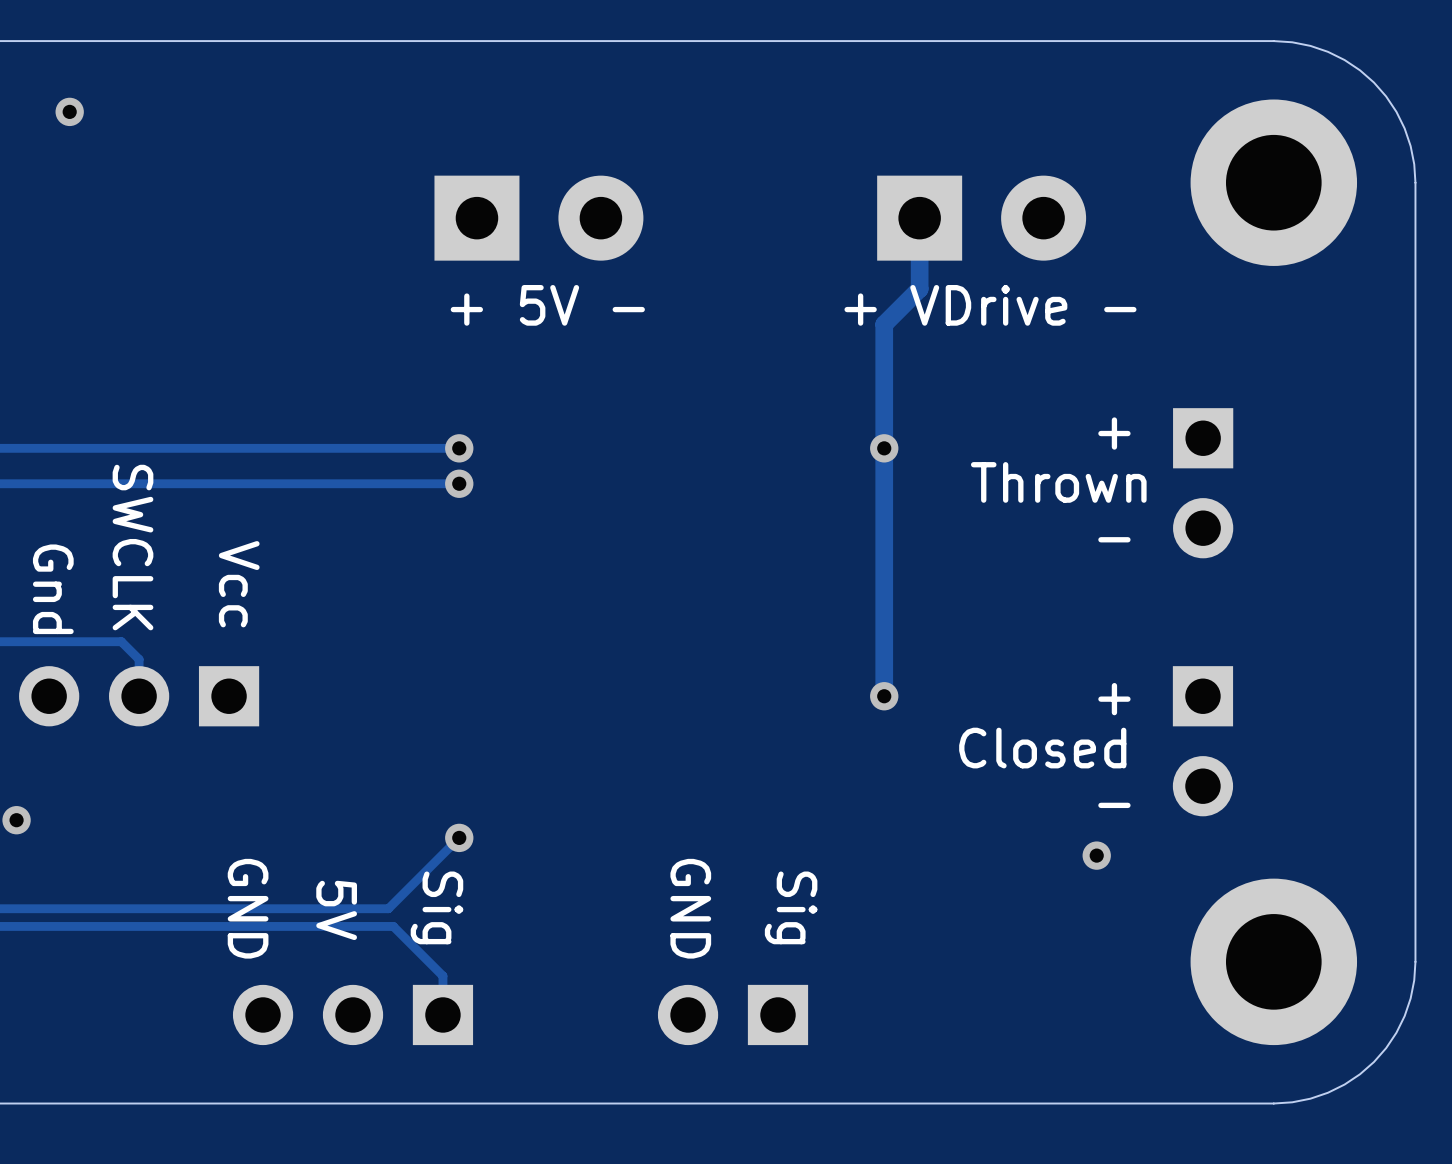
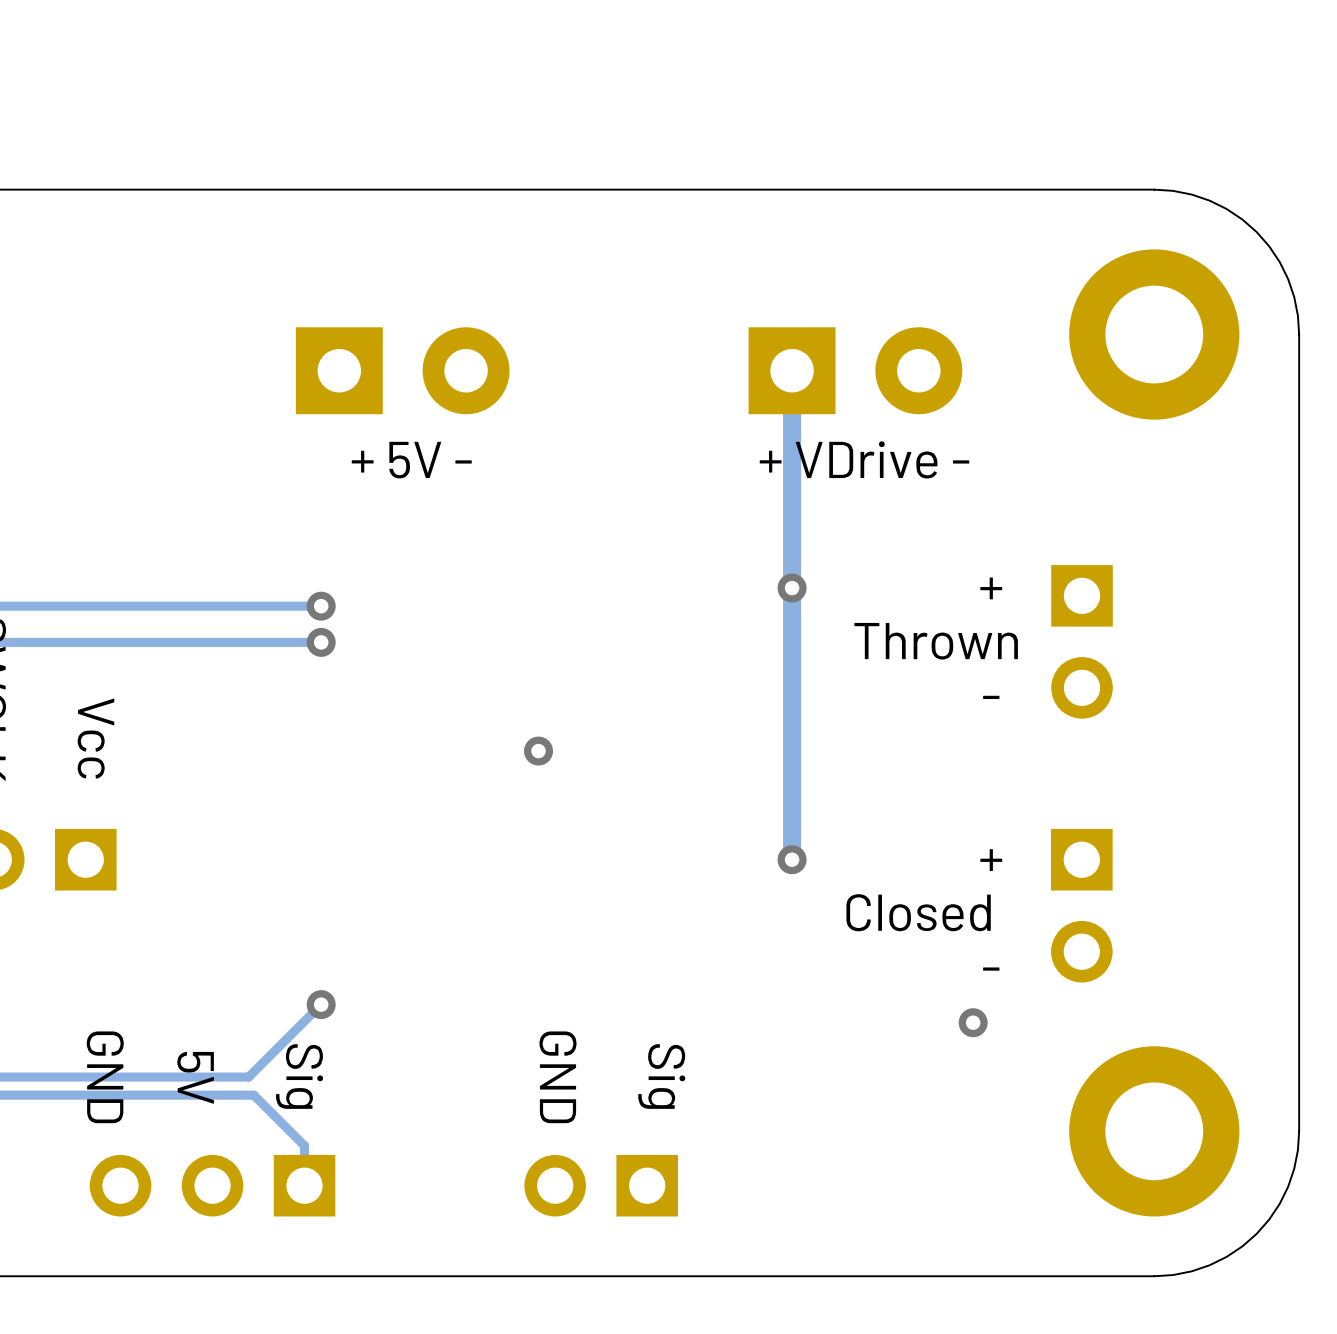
track: (919, 288) (884, 324) (884, 696) -> (792, 443) (792, 859)
via position: (884, 448) -> (792, 588)
via: none -> (538, 751)
via position: (884, 696) -> (792, 859)

